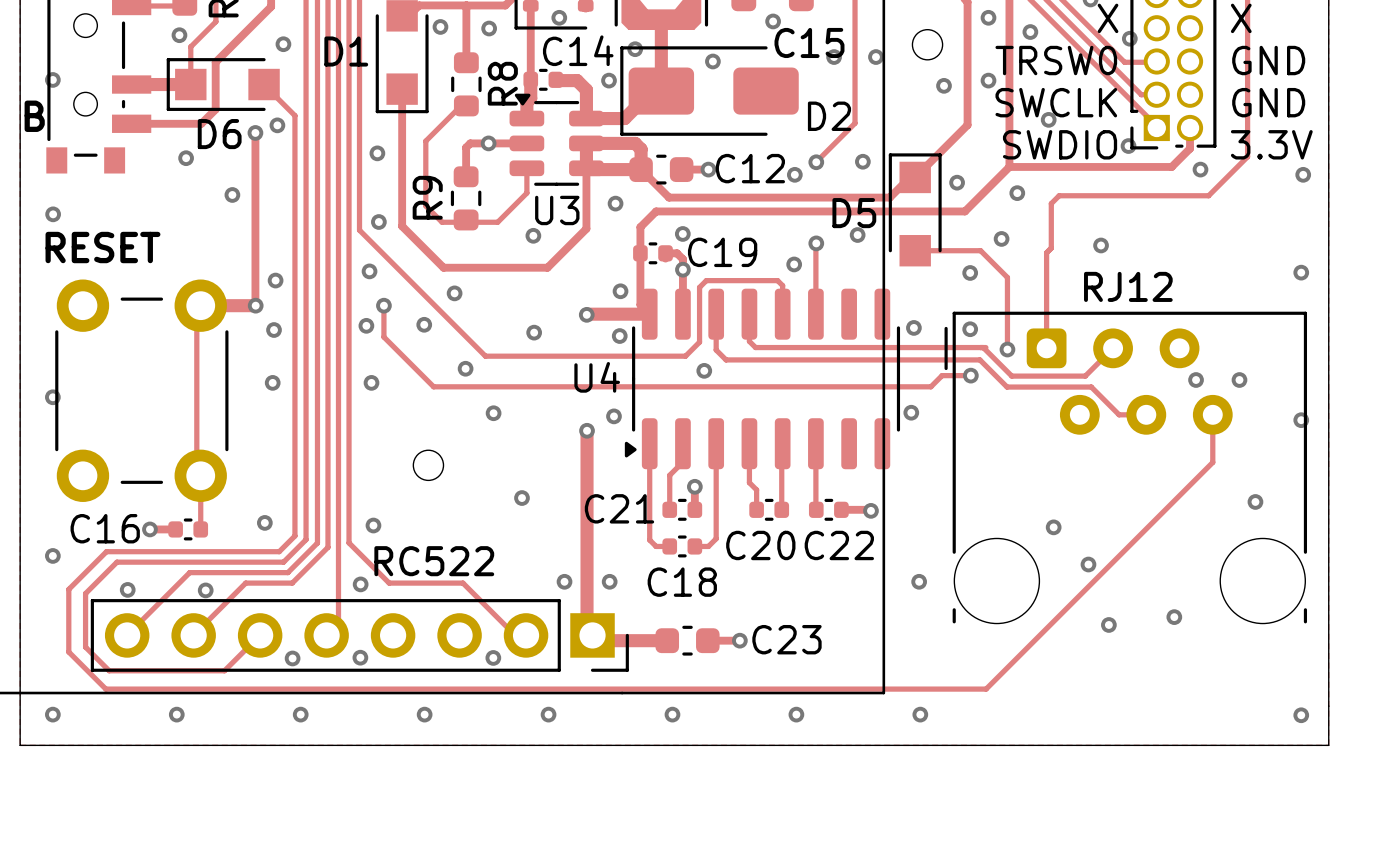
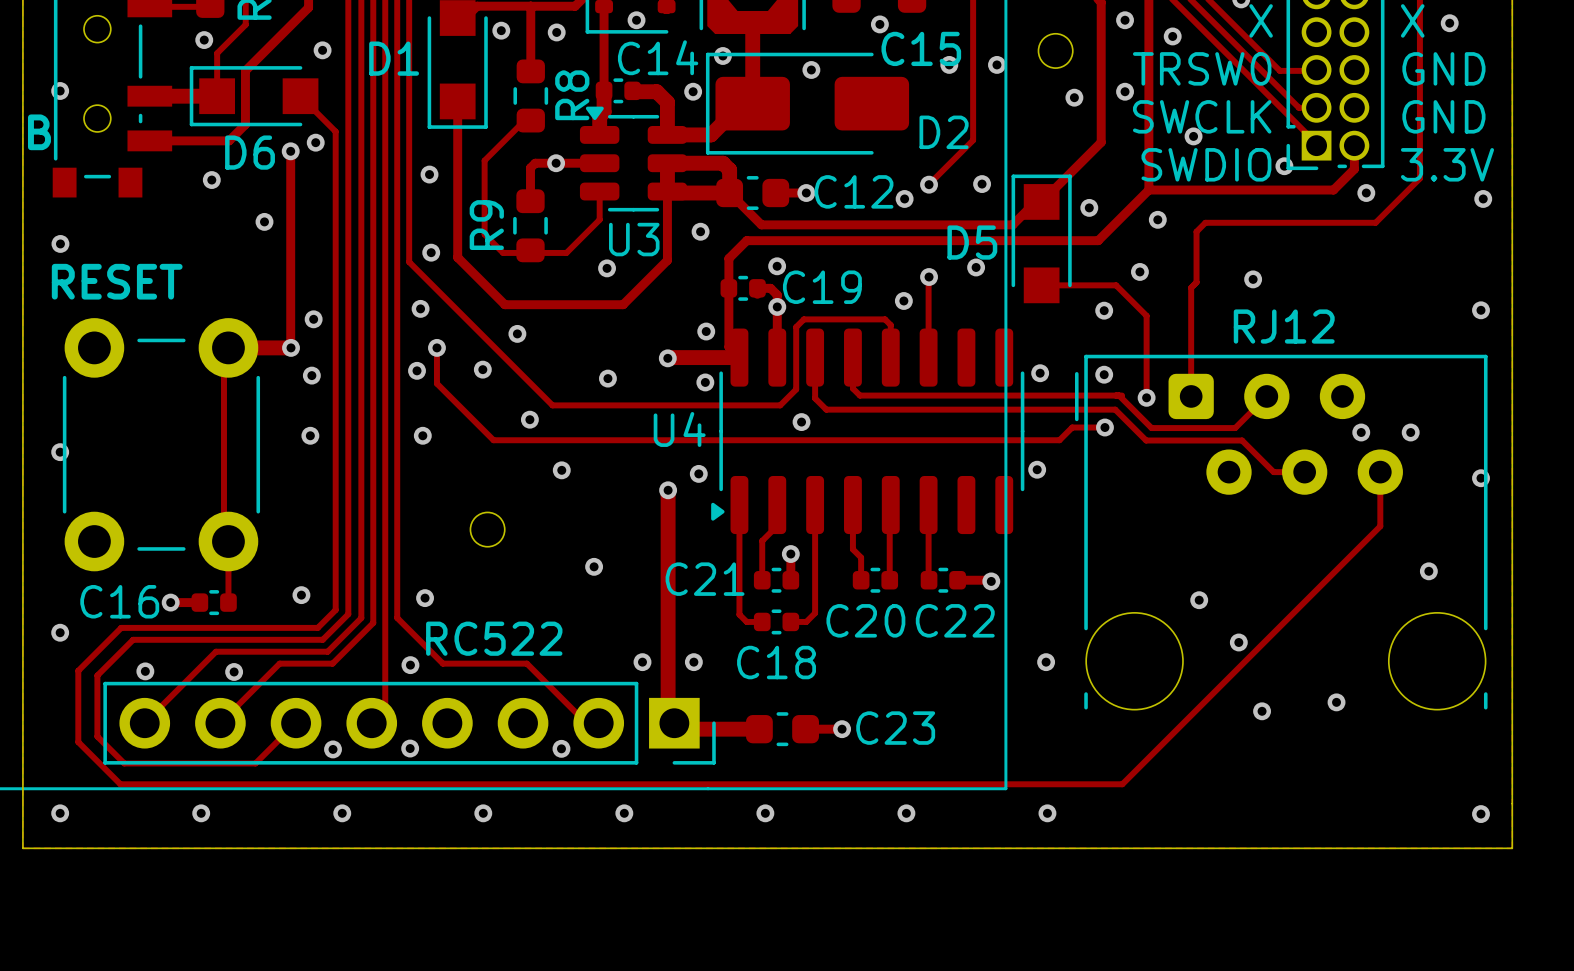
via position: (1129, 38) -> (1449, 23)

